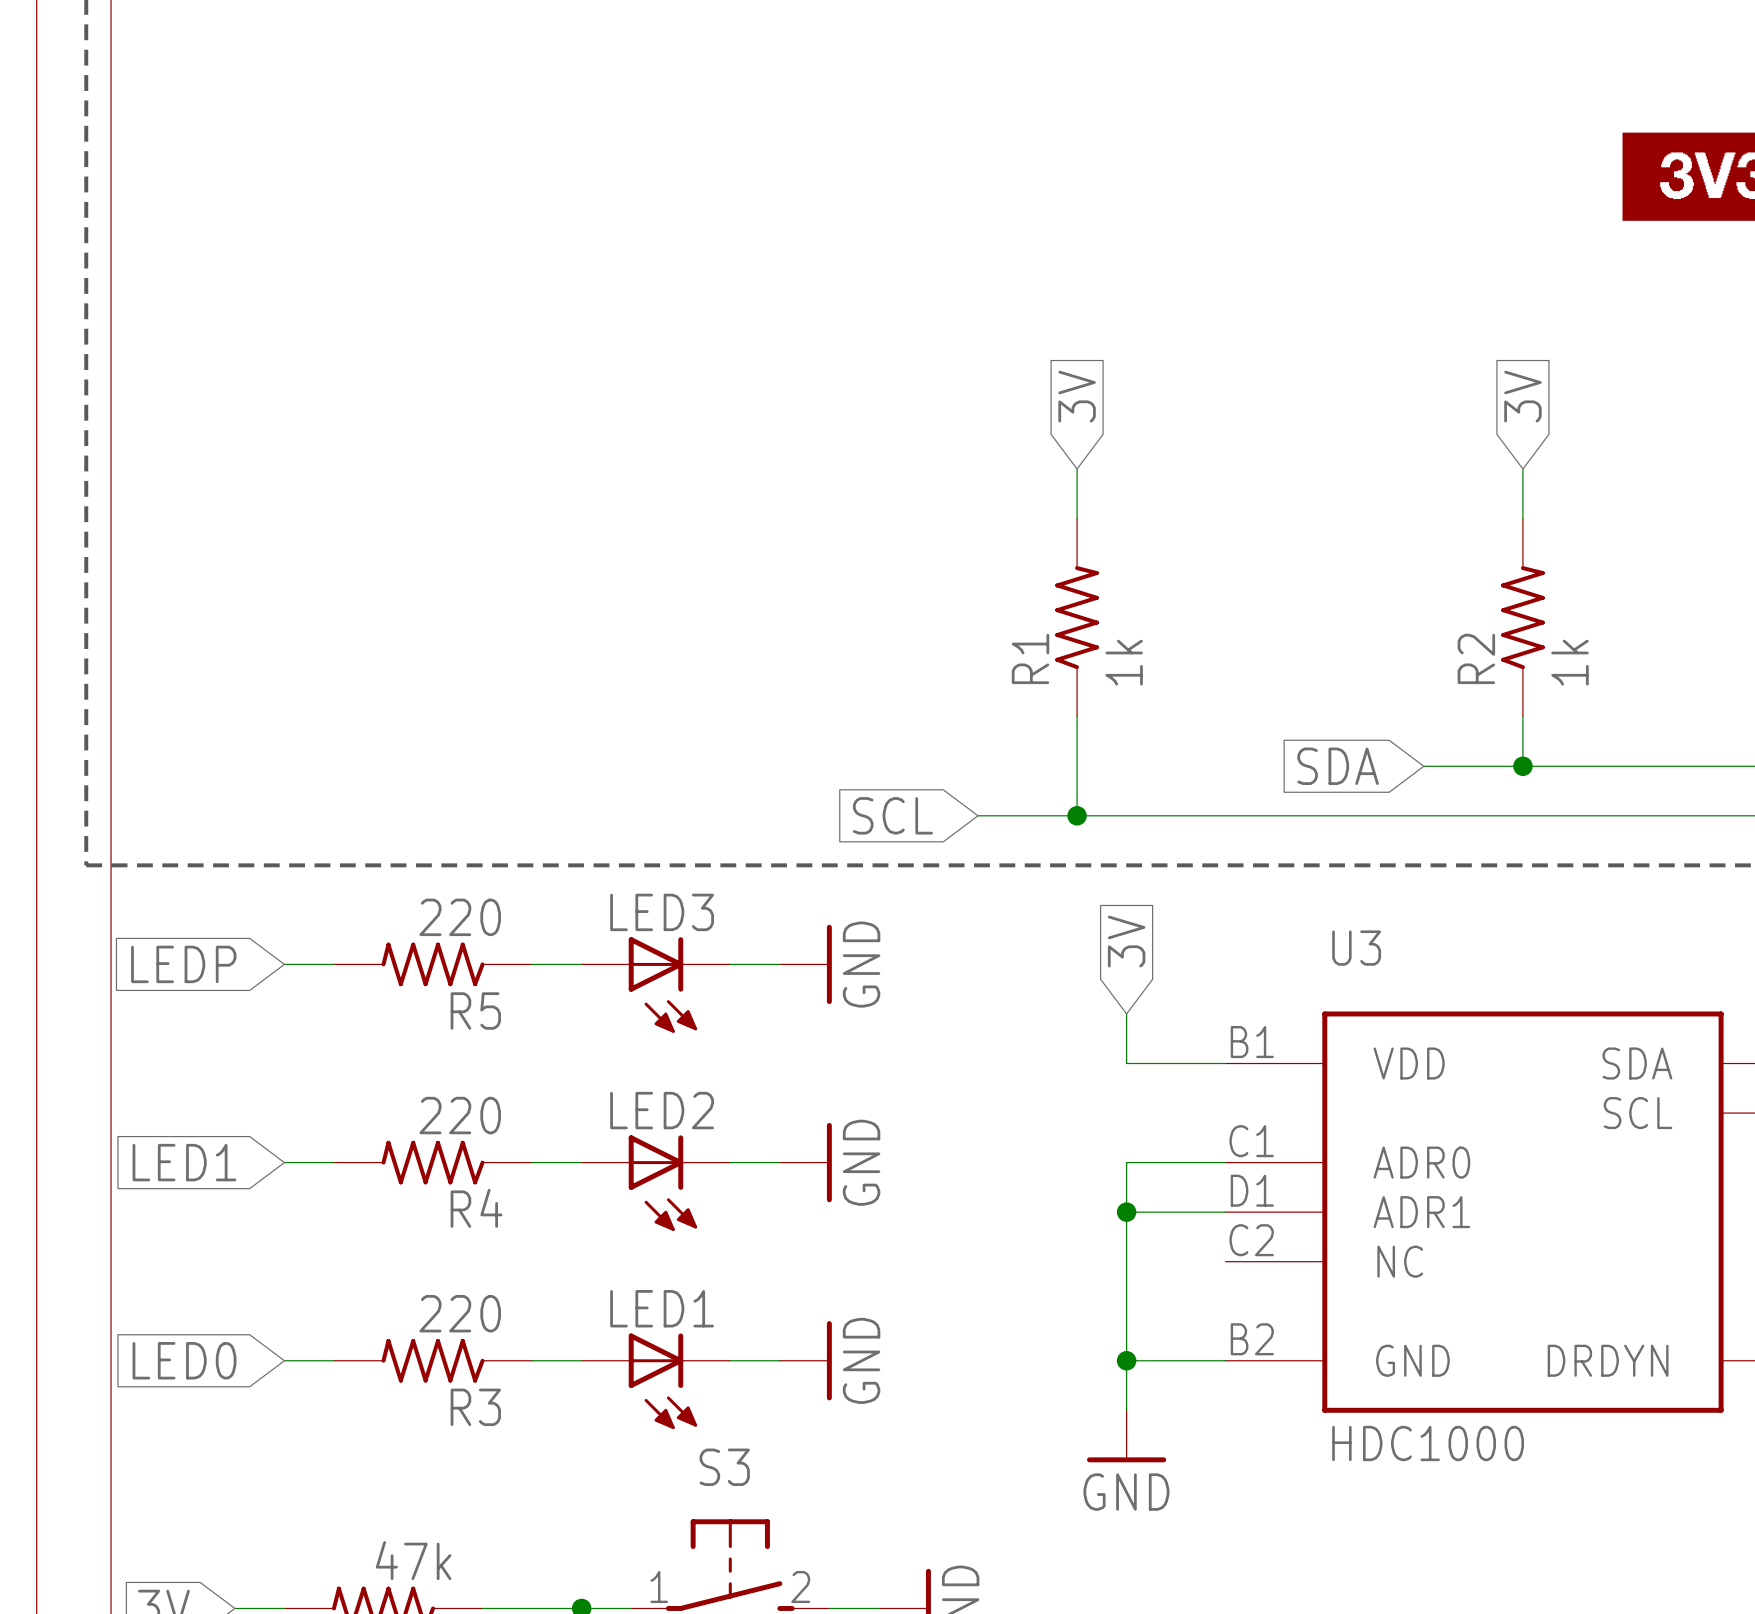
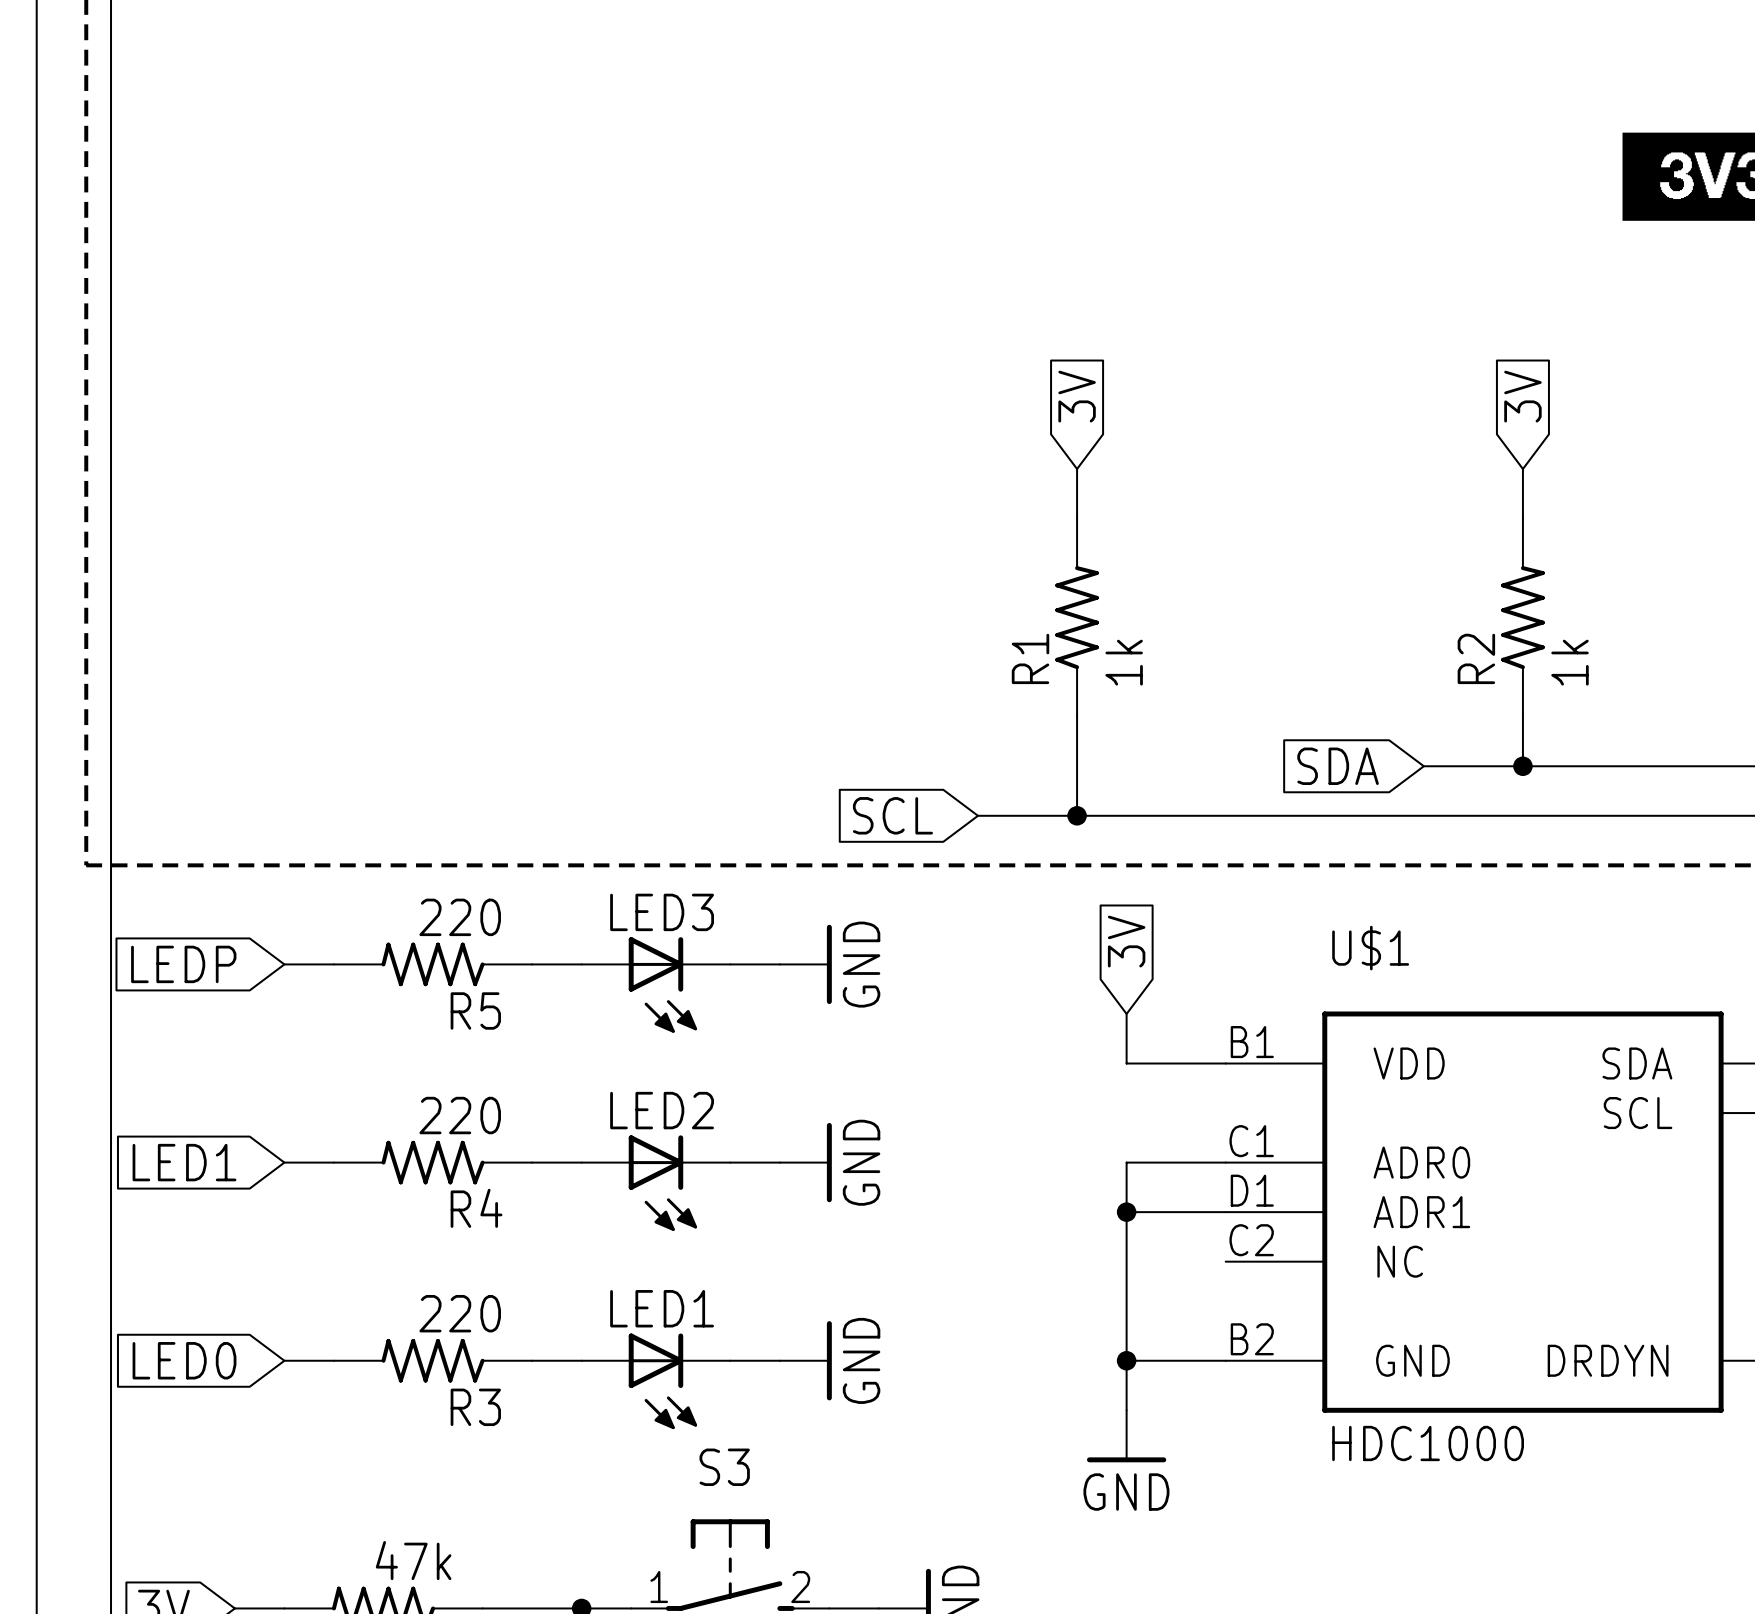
U3 name: U3 (1356, 948) -> U$1 (1370, 948)

